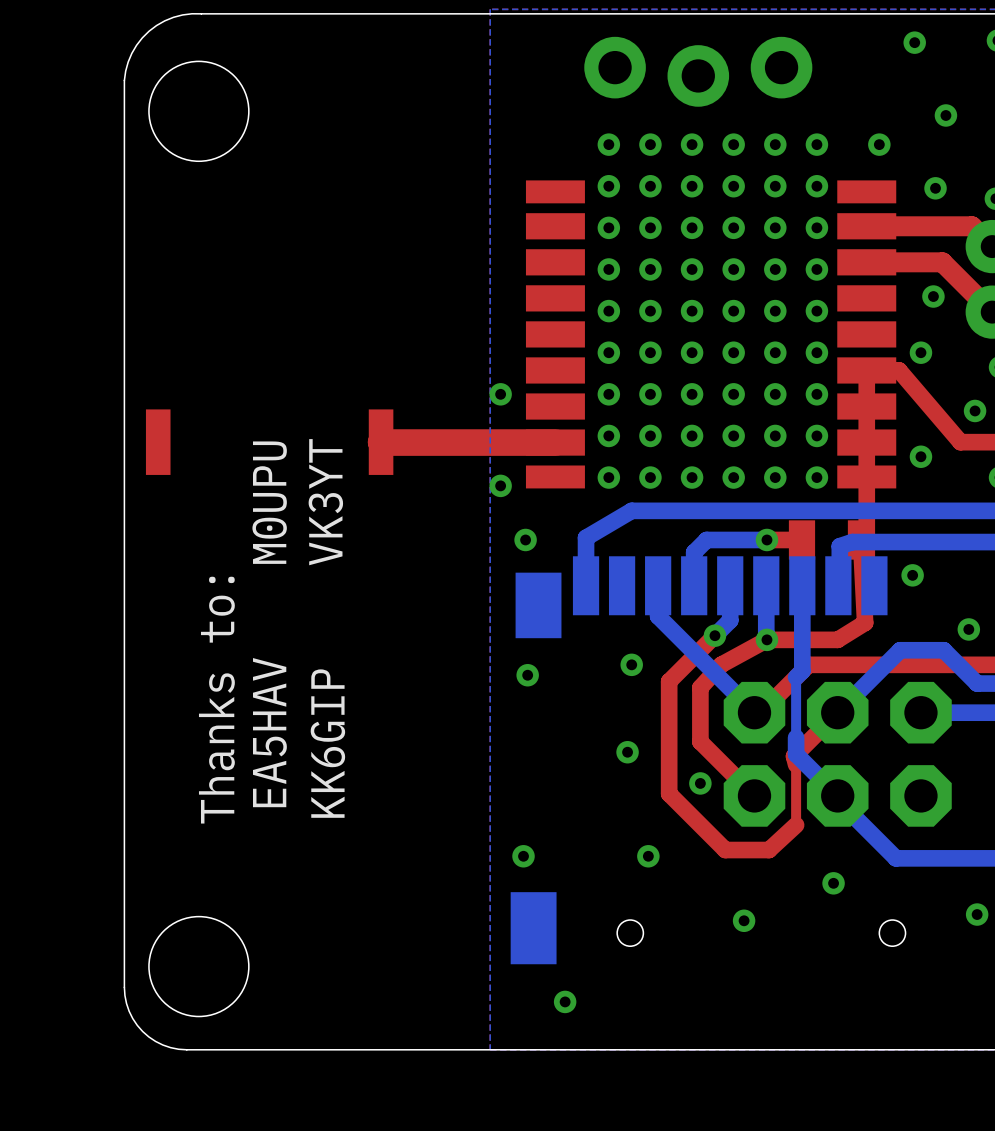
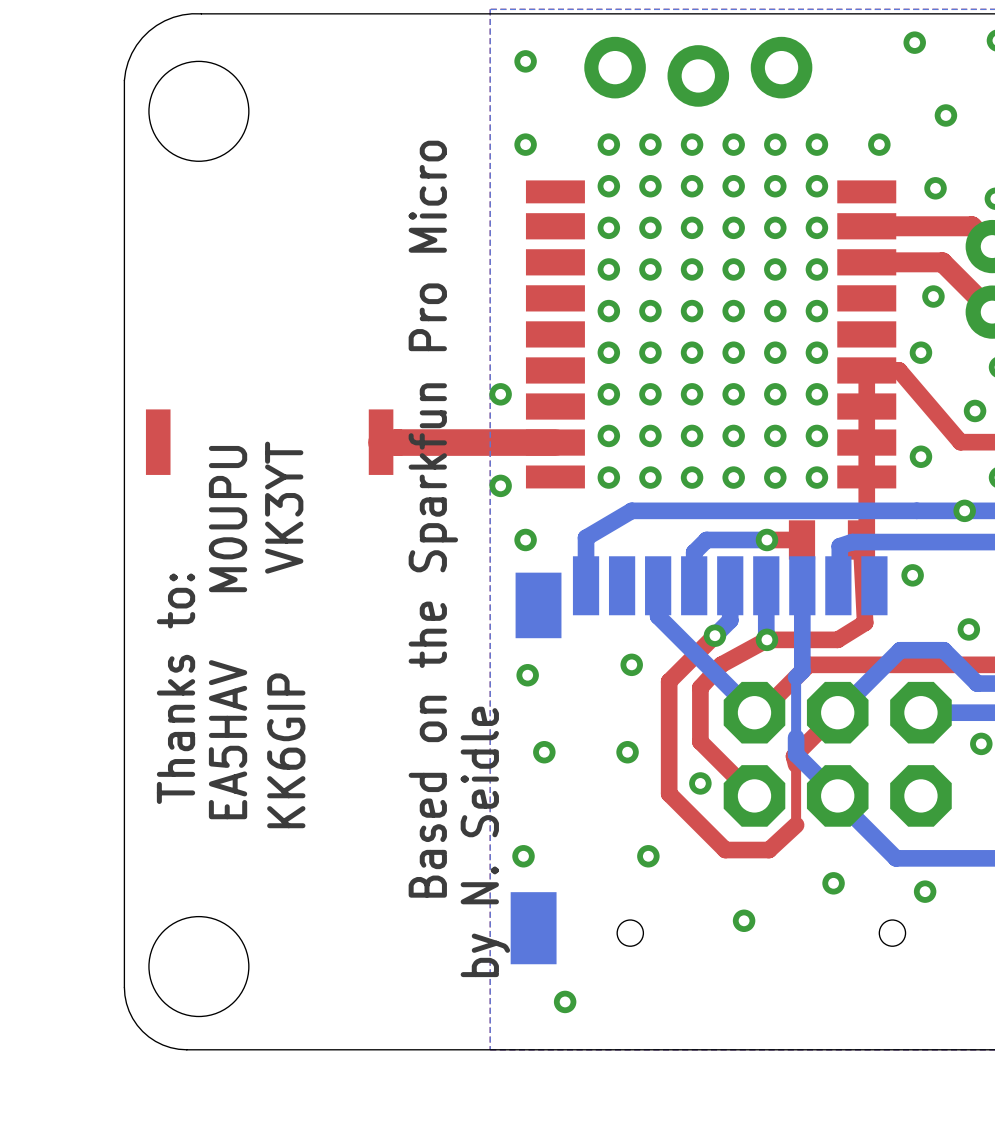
via: none -> (525, 61)
via: none -> (525, 144)
text position: M0UPU (269, 502) -> M0UPU (228, 519)
text position: VK3YT (325, 502) -> VK3YT (284, 507)
via: none -> (964, 510)
text: none -> Based on the Sparkfun Pro Micro (433, 519)
text position: Thanks to: (216, 700) -> Thanks to: (176, 688)
text position: EA5HAV (269, 732) -> EA5HAV (228, 739)
text position: KK6GIP (327, 743) -> KK6GIP (286, 750)
via: none -> (981, 743)
via: none -> (544, 752)
text: none -> by N. Seidle (485, 841)
via: none -> (925, 891)
via: (977, 914) -> none

